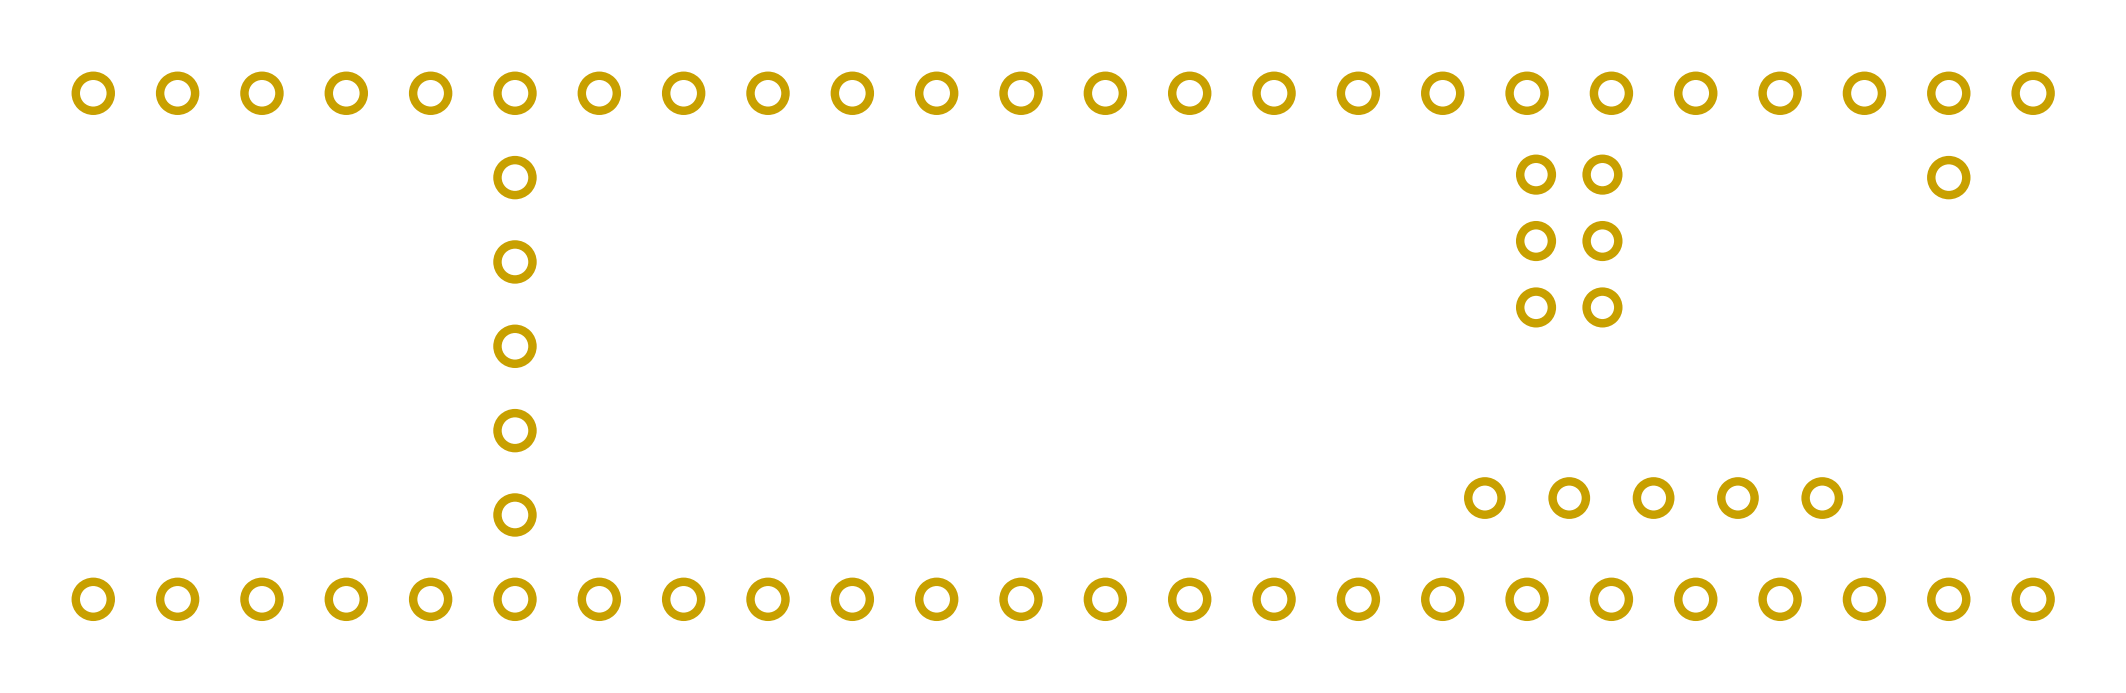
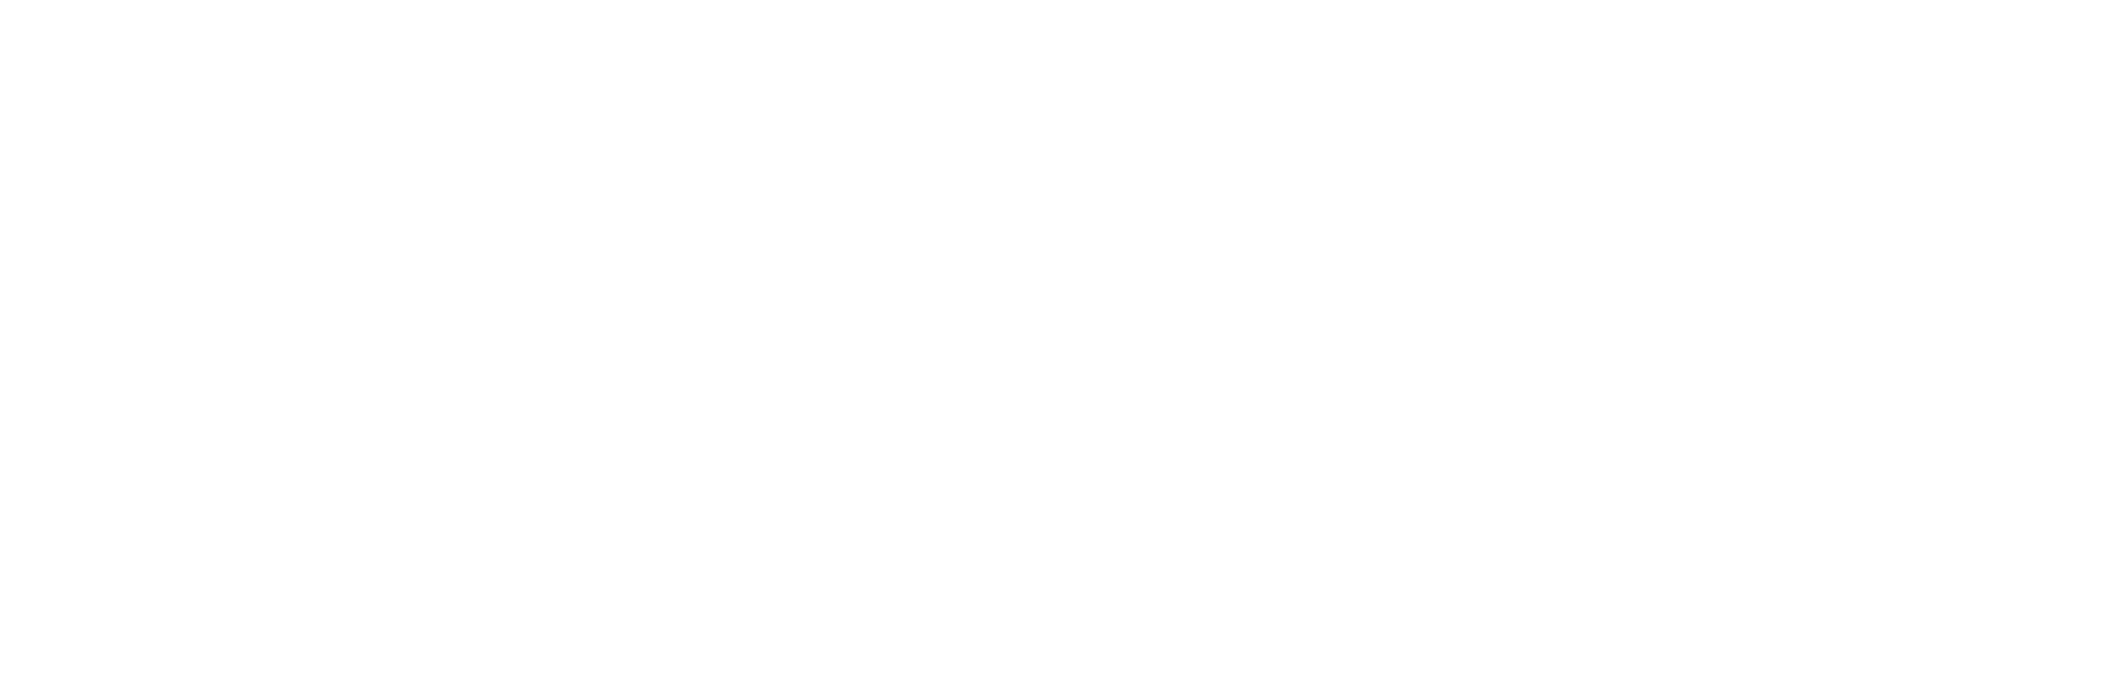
part: (1063, 346) -> none

